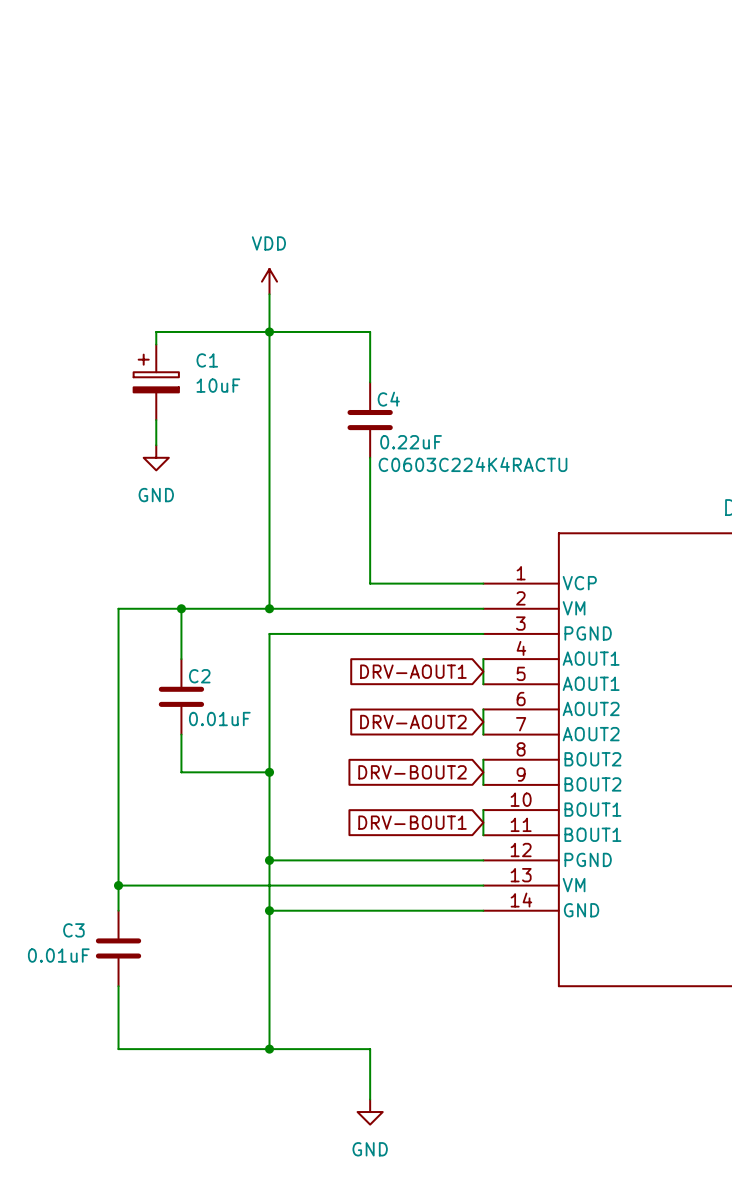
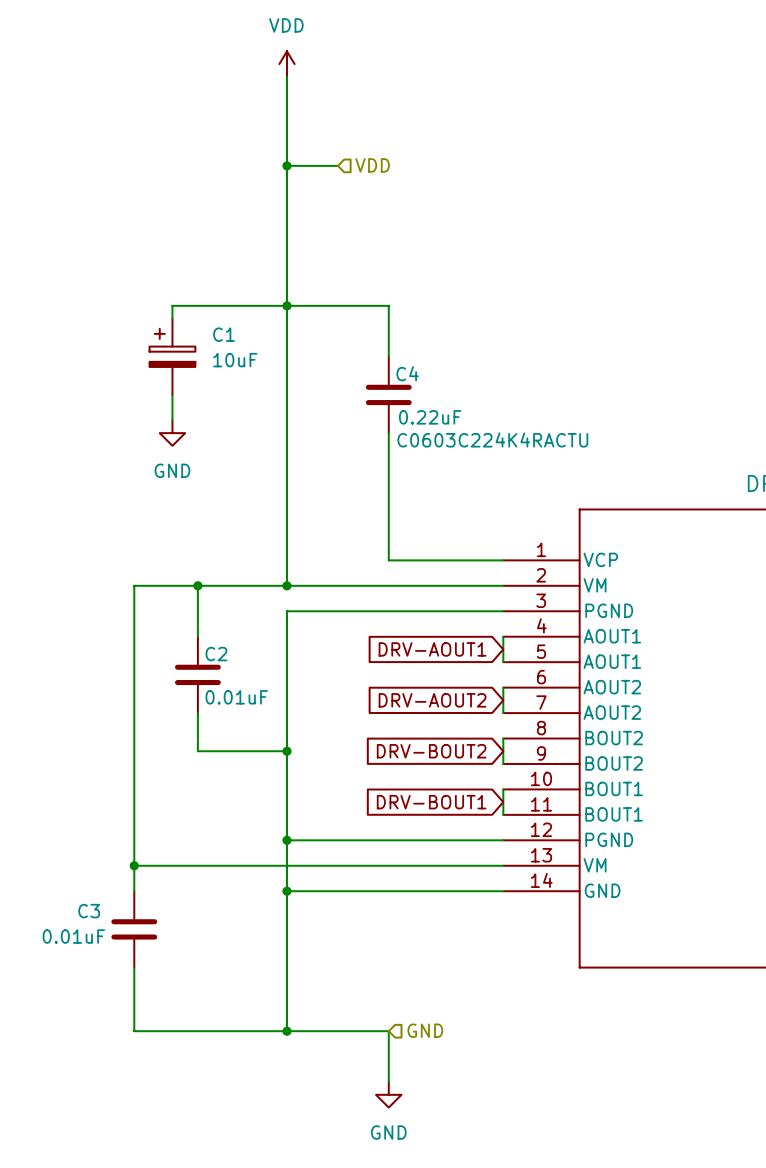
wire: none -> (286, 76) (286, 267)
wire: none -> (286, 165) (337, 165)
junction: none -> (286, 165)
hierarchical label: none -> VDD (372, 165)
power symbol position: VDD (269, 281) -> VDD (286, 64)
hierarchical label: none -> GND (425, 1030)

